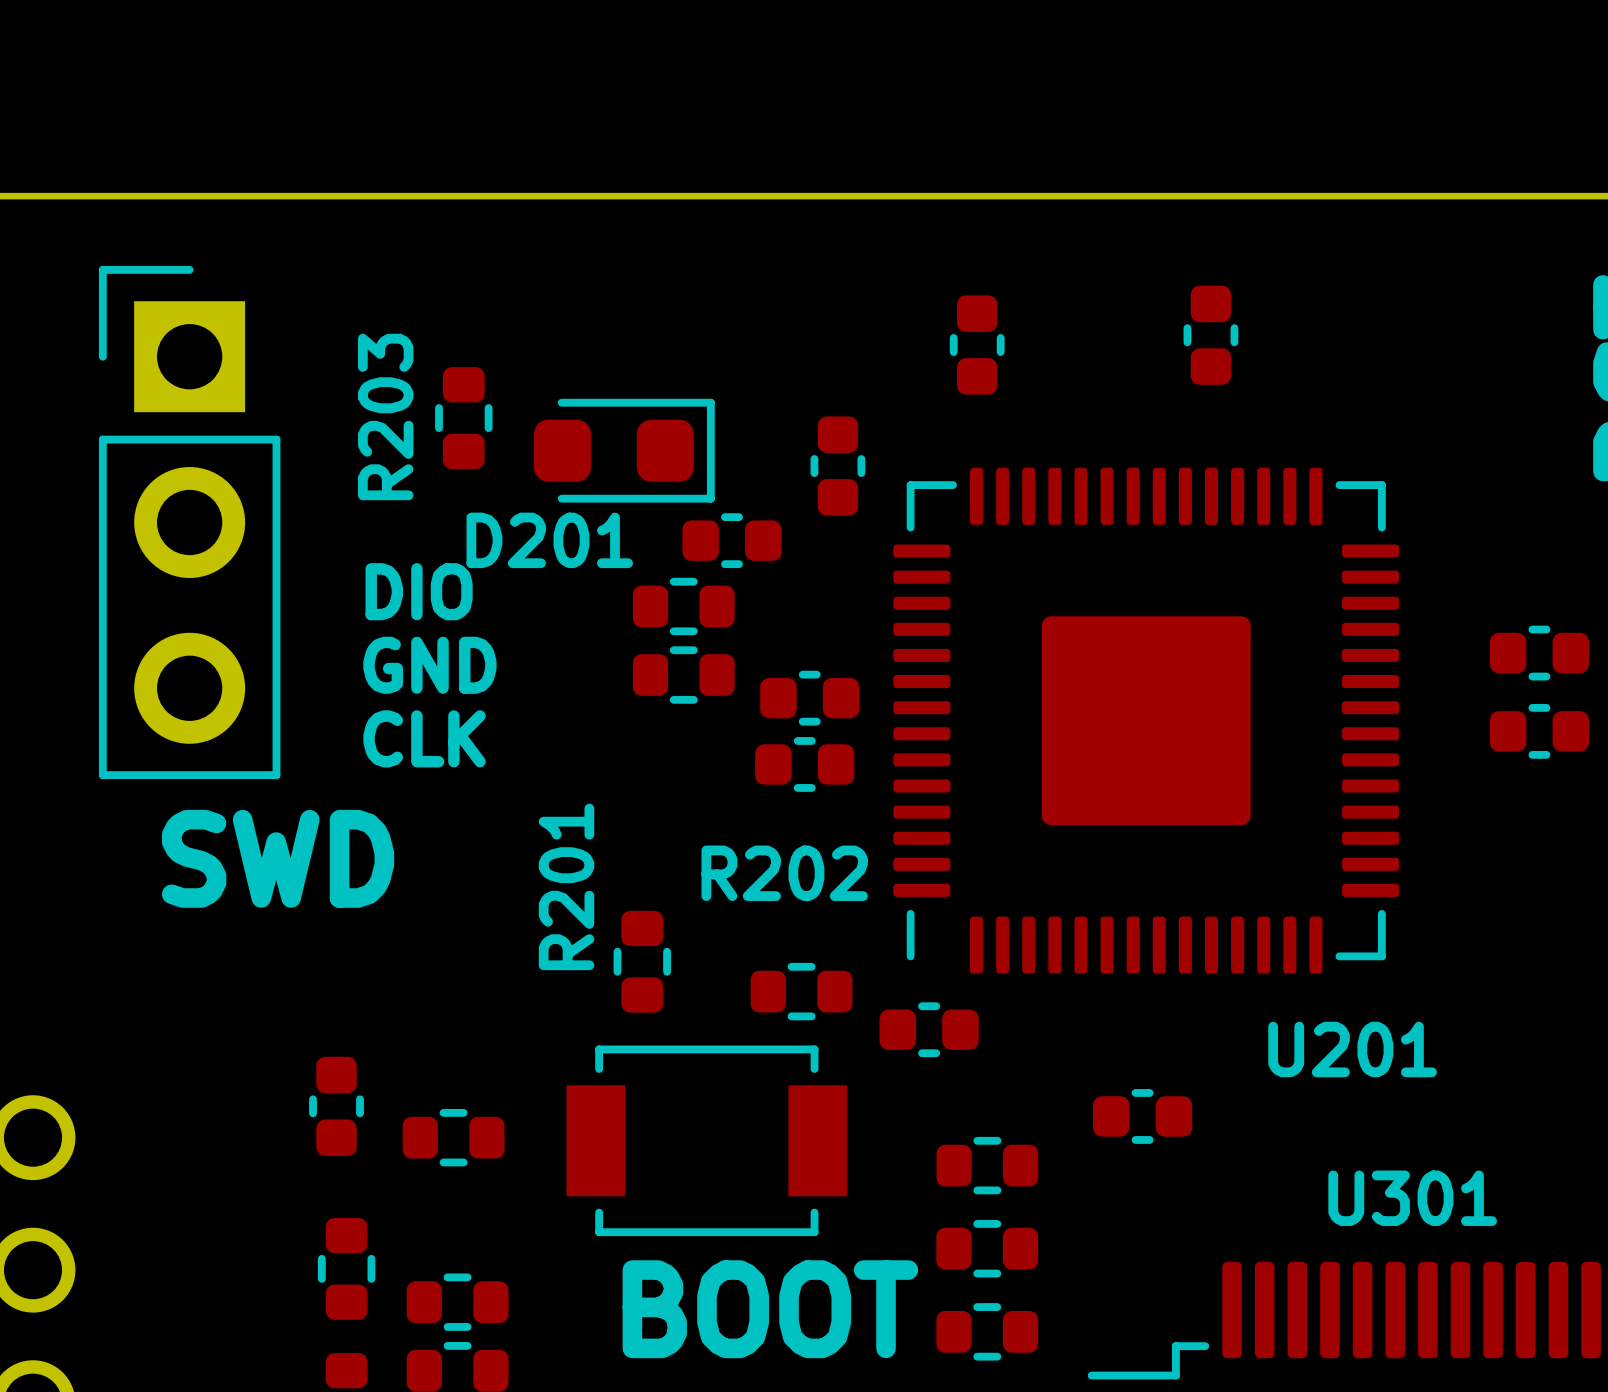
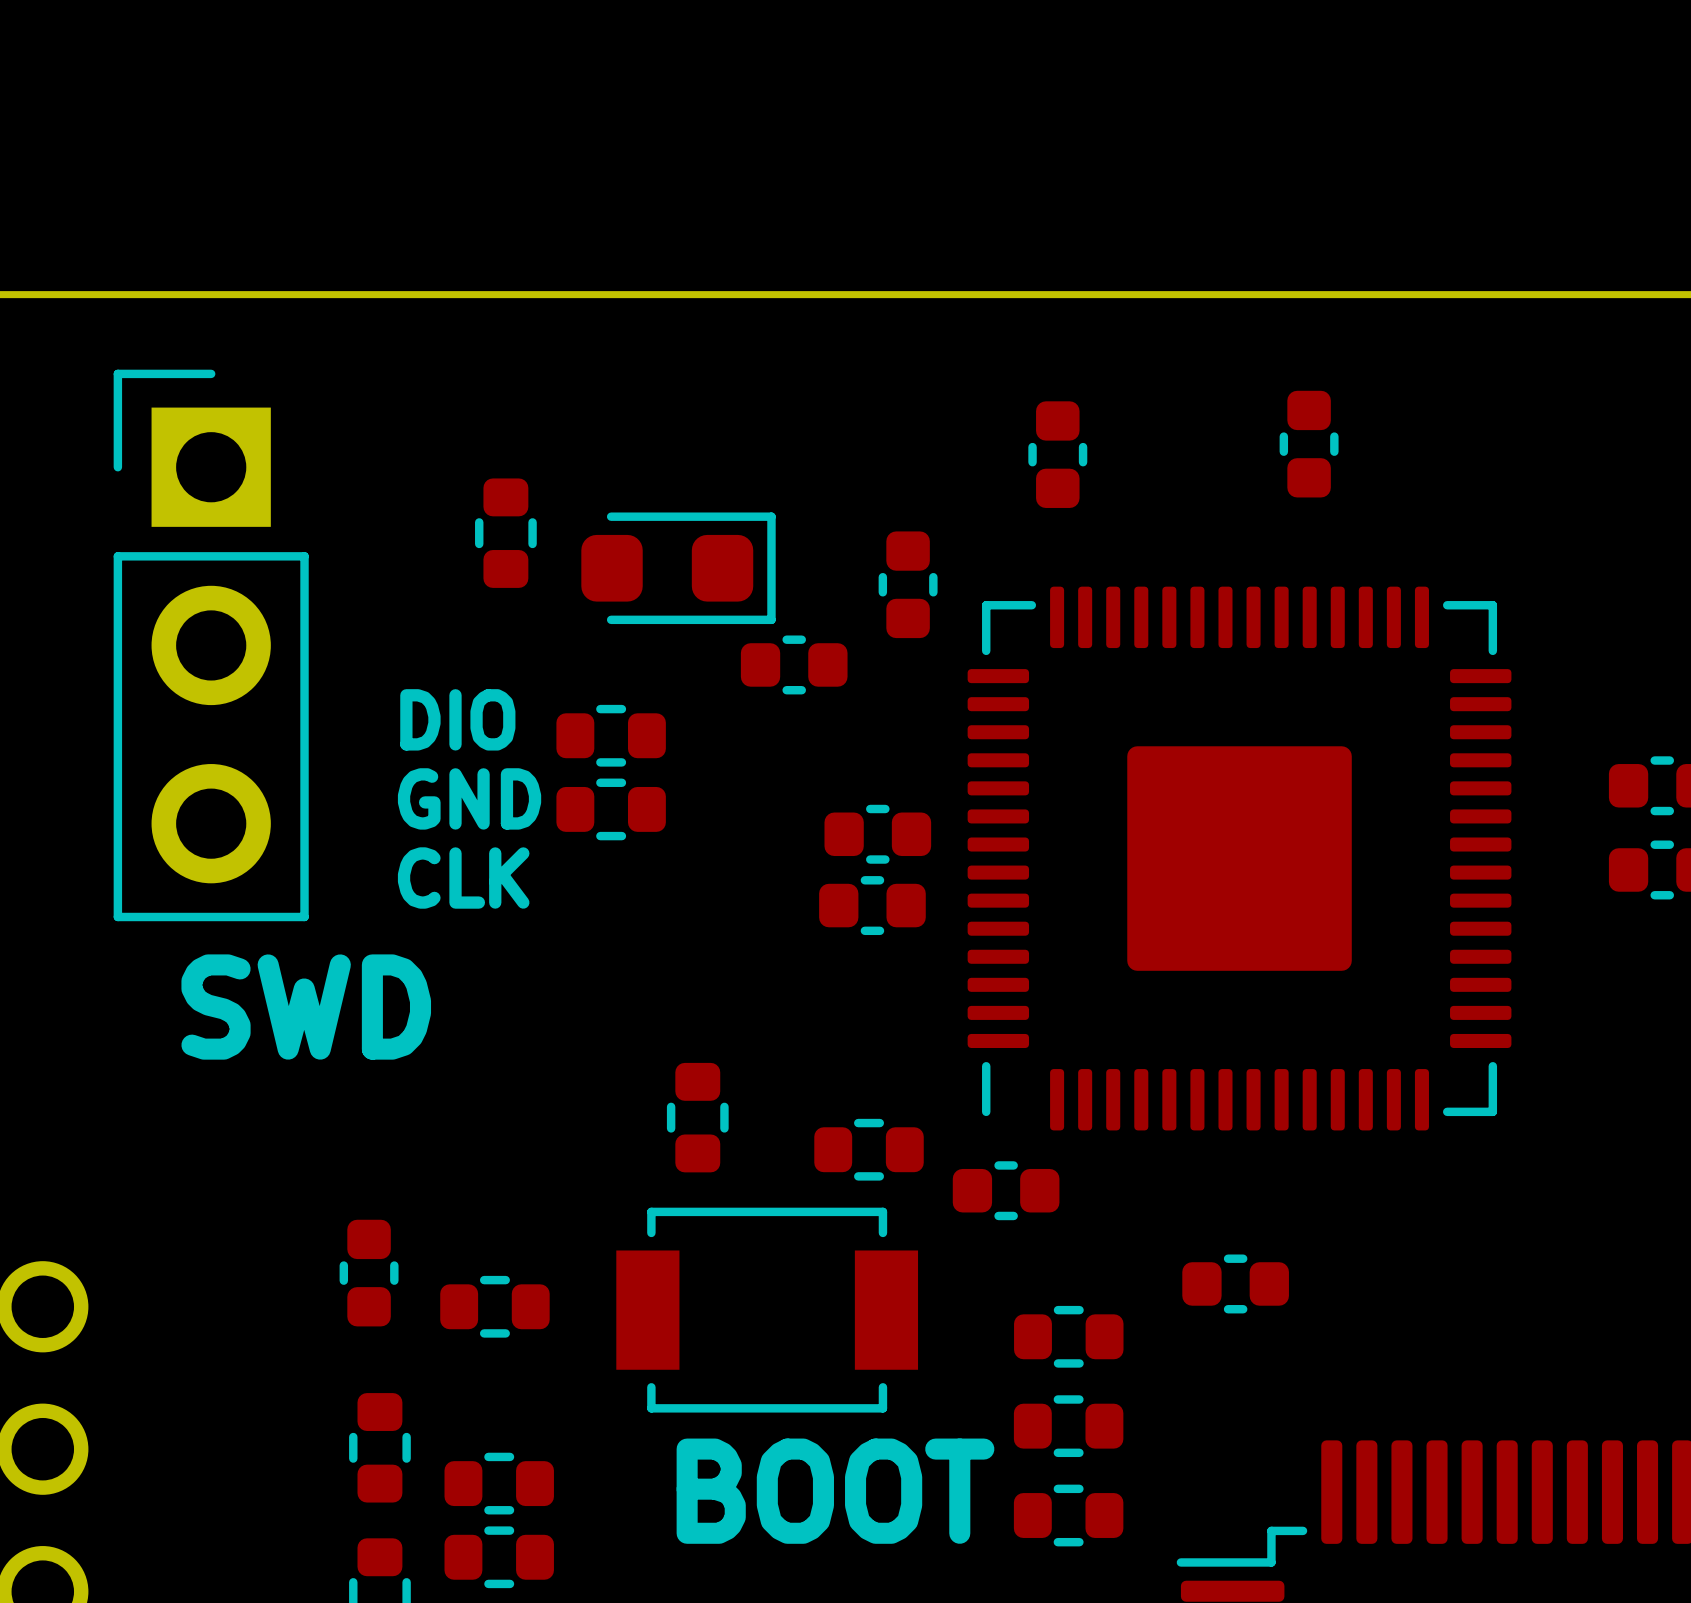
R203 name: R203 (385, 416) -> none
D201 name: D201 (549, 540) -> none
part: none -> (611, 735)
part: (683, 606) -> none
part: none -> (611, 809)
part: (683, 675) -> none
R202 name: R202 (784, 873) -> none
R201 name: R201 (566, 886) -> none
U201 name: U201 (1352, 1049) -> none
U301 name: U301 (1412, 1198) -> none

